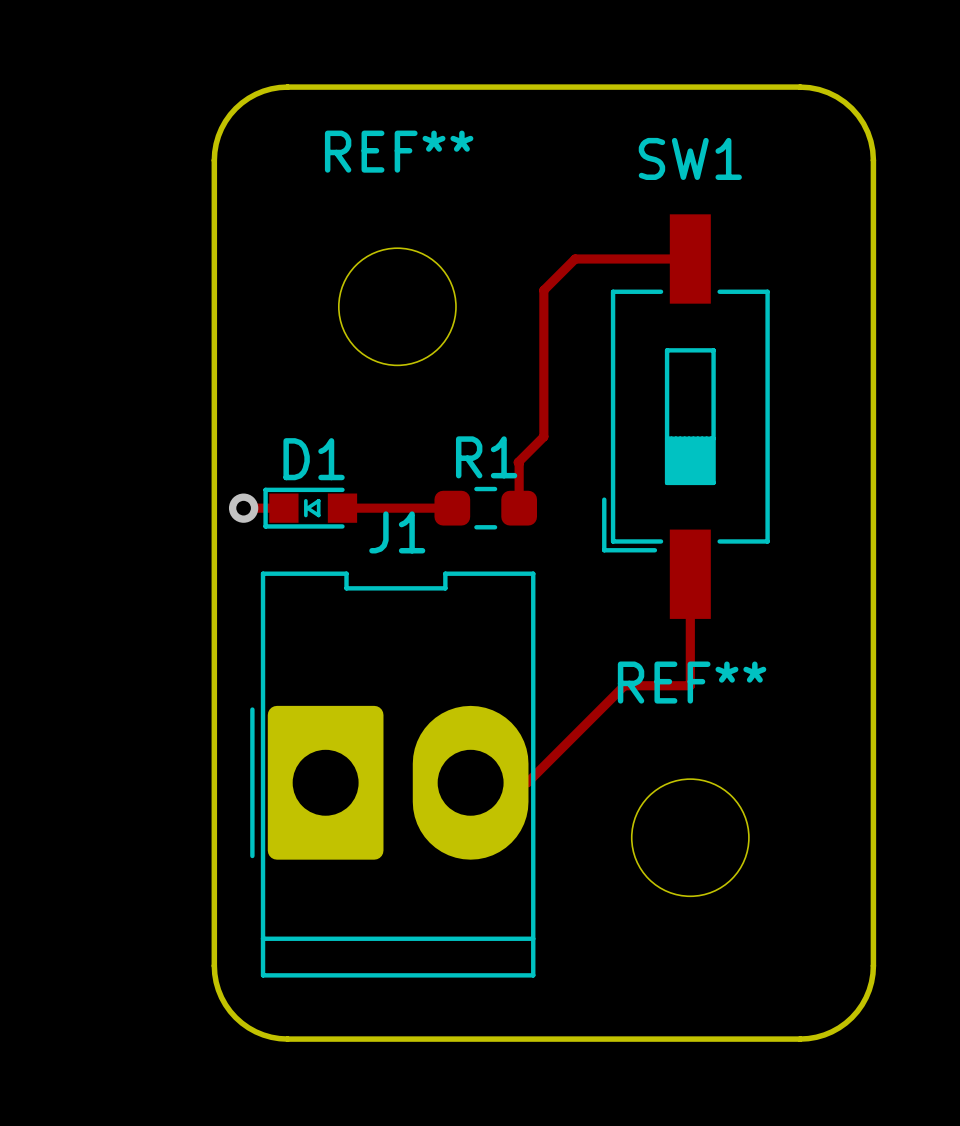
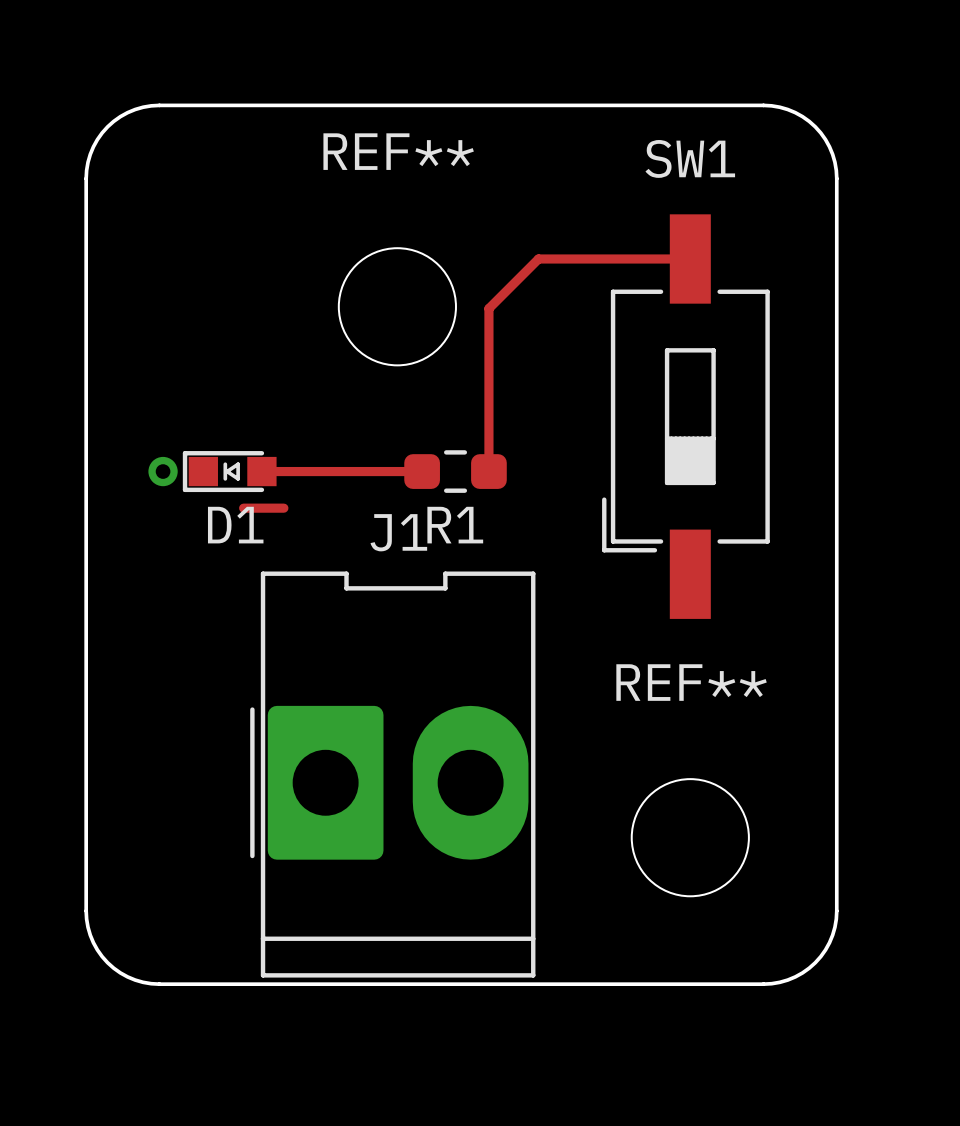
board edge: (287, 87) (800, 87) (819, 89) (836, 96) (851, 108) (863, 123) (870, 141) (873, 160) (873, 965) (871, 982) (866, 997) (851, 1017) (839, 1027) (816, 1037) (800, 1039) (287, 1039) (263, 1034) (248, 1027) (235, 1017) (225, 1004) (218, 990) (214, 965) (214, 152) (218, 136) (225, 121) (241, 103) (263, 91) (287, 87) -> (159, 105) (143, 107) (127, 112) (107, 126) (93, 146) (86, 170) (86, 910) (90, 935) (102, 956) (113, 968) (127, 976) (143, 982) (159, 984) (763, 984) (787, 980) (809, 968) (820, 956) (829, 942) (834, 927) (836, 910) (836, 178) (832, 154) (820, 132) (809, 121) (795, 112) (779, 107) (763, 105) (159, 105)
track: (575, 258) (543, 290) (543, 436) (518, 462) (519, 508) -> (575, 258) (538, 258) (488, 308) (488, 471)
R1 name position: R1 (486, 457) -> R1 (455, 525)
D1 name position: D1 (314, 459) -> D1 (235, 525)
track: none -> (261, 471) (422, 471)
via position: (243, 508) -> (163, 471)
D1 position: (310, 508) -> (229, 471)
track: (342, 508) (452, 508) -> none
R1 position: (485, 508) -> (455, 471)
track: (690, 574) (690, 685) (624, 685) (527, 782) (470, 782) -> none

